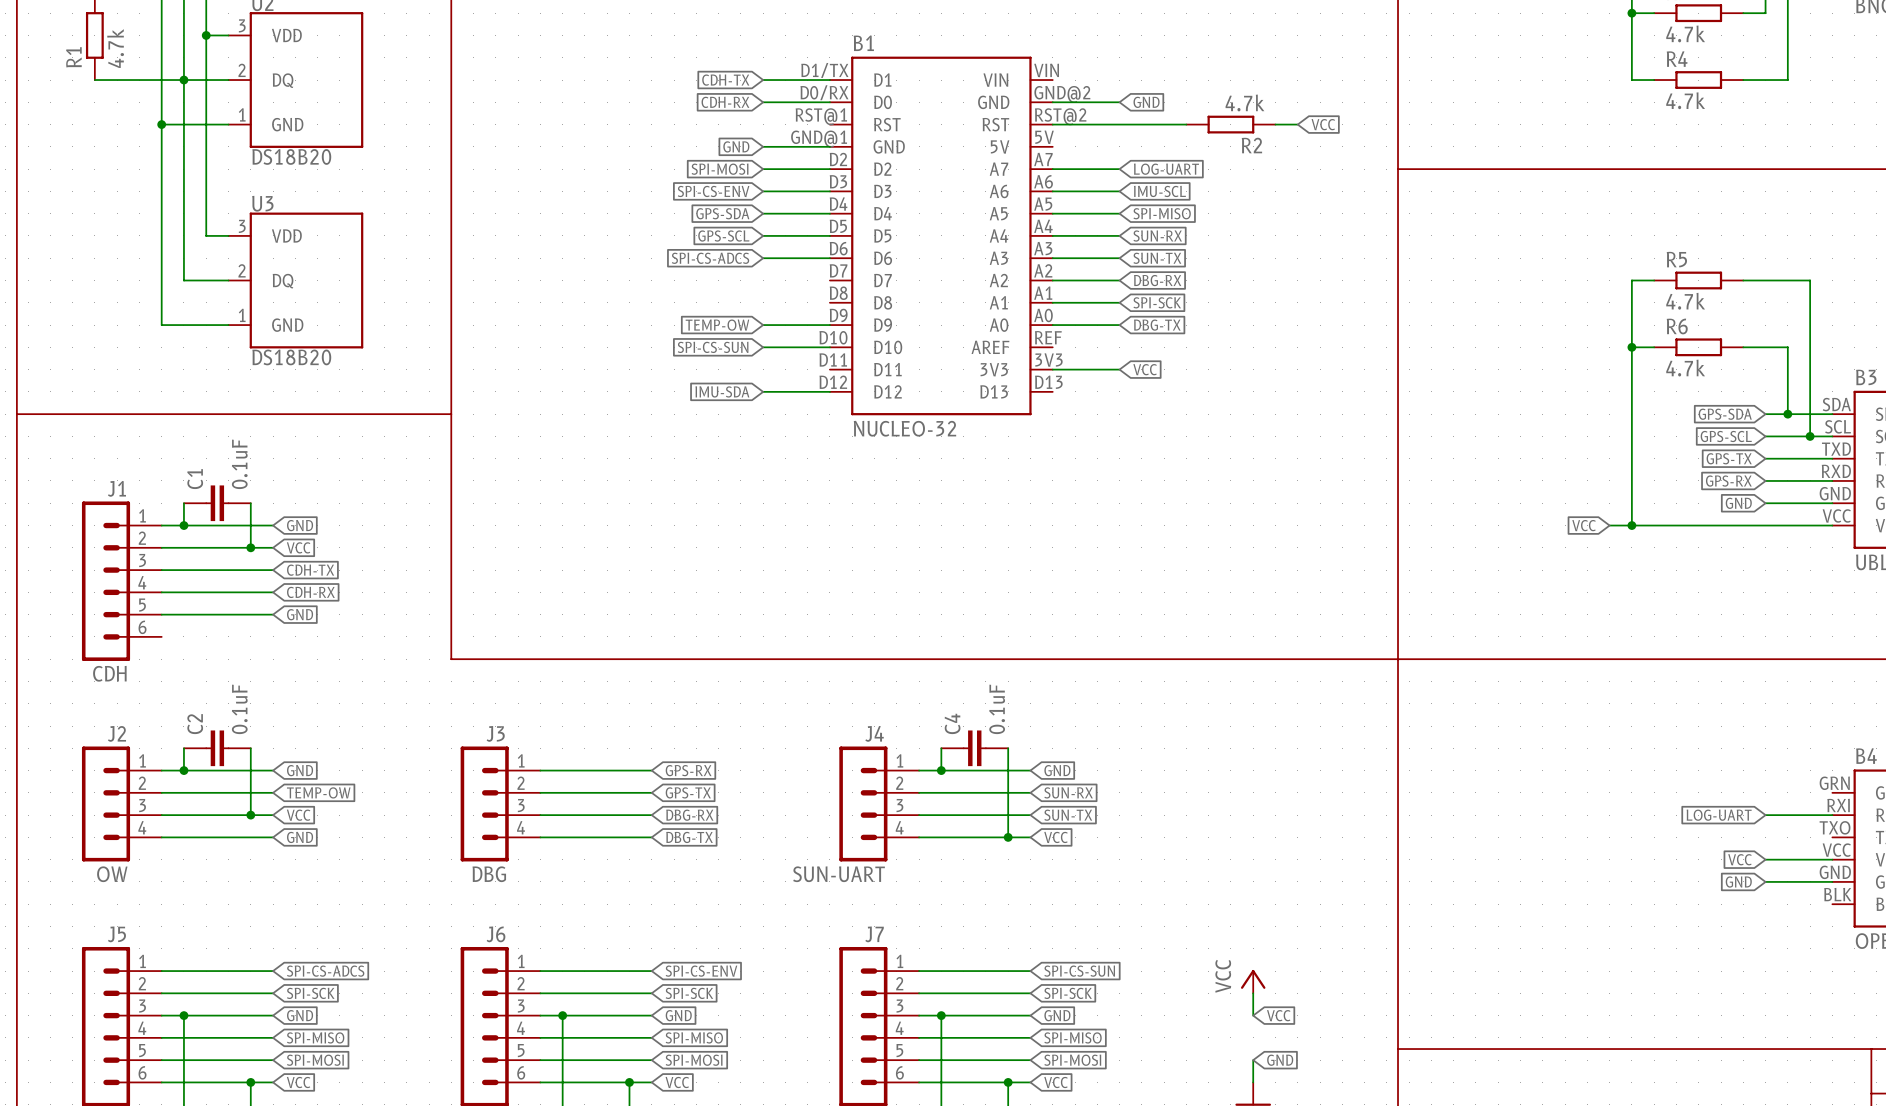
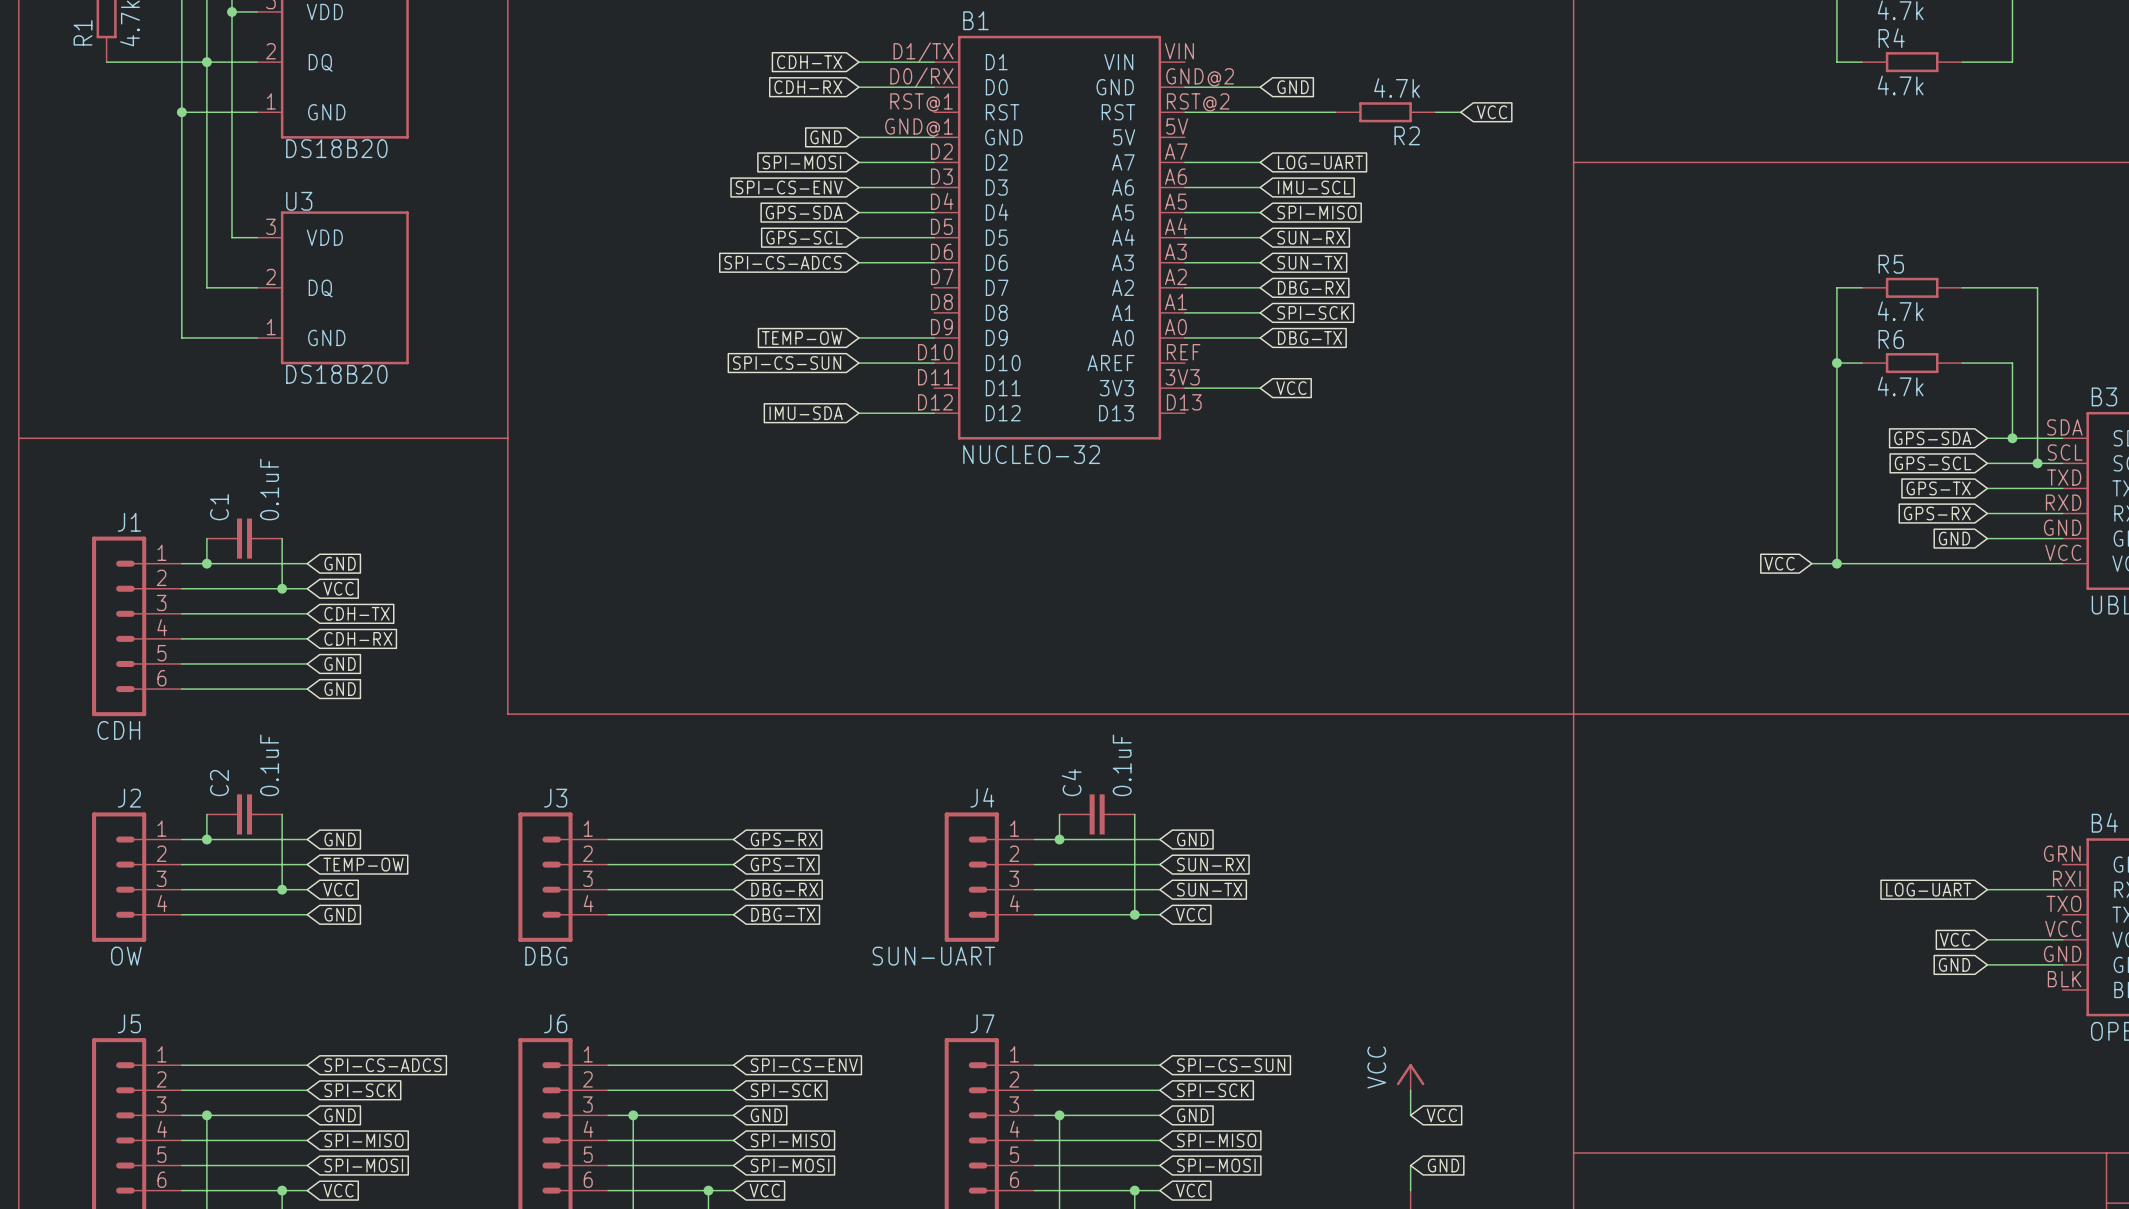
wire: none -> (181, 689) (307, 689)
global label: none -> GND (340, 689)

